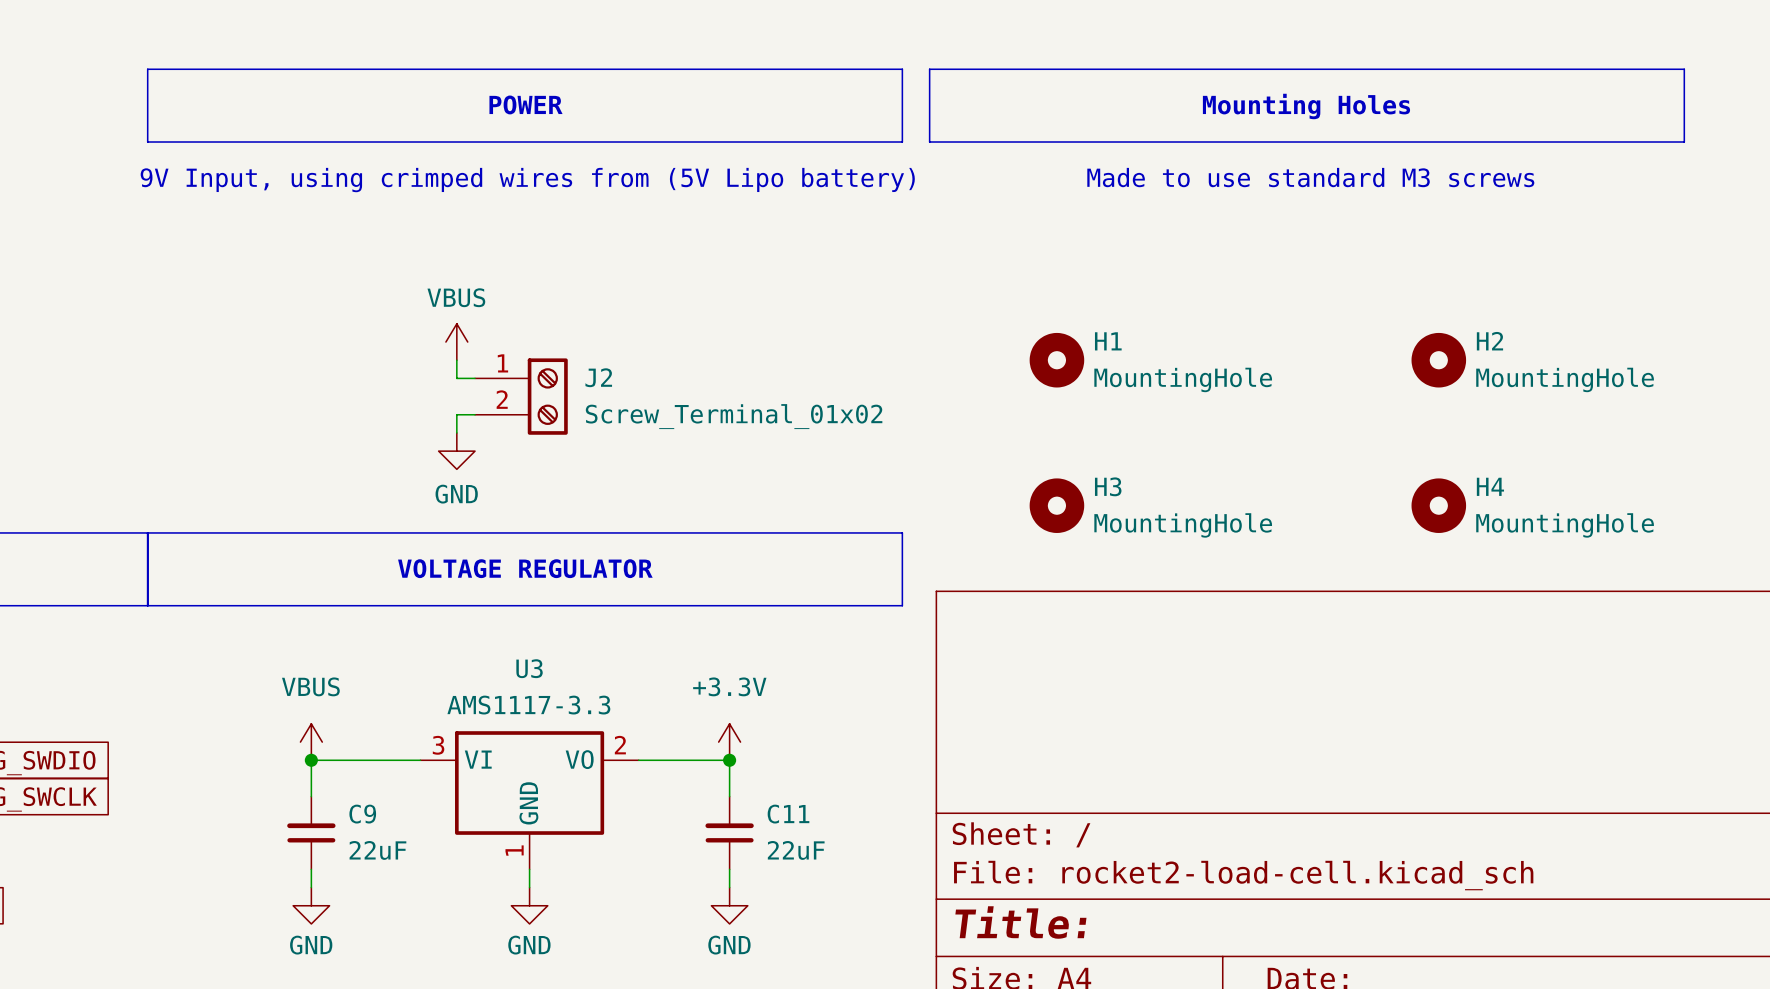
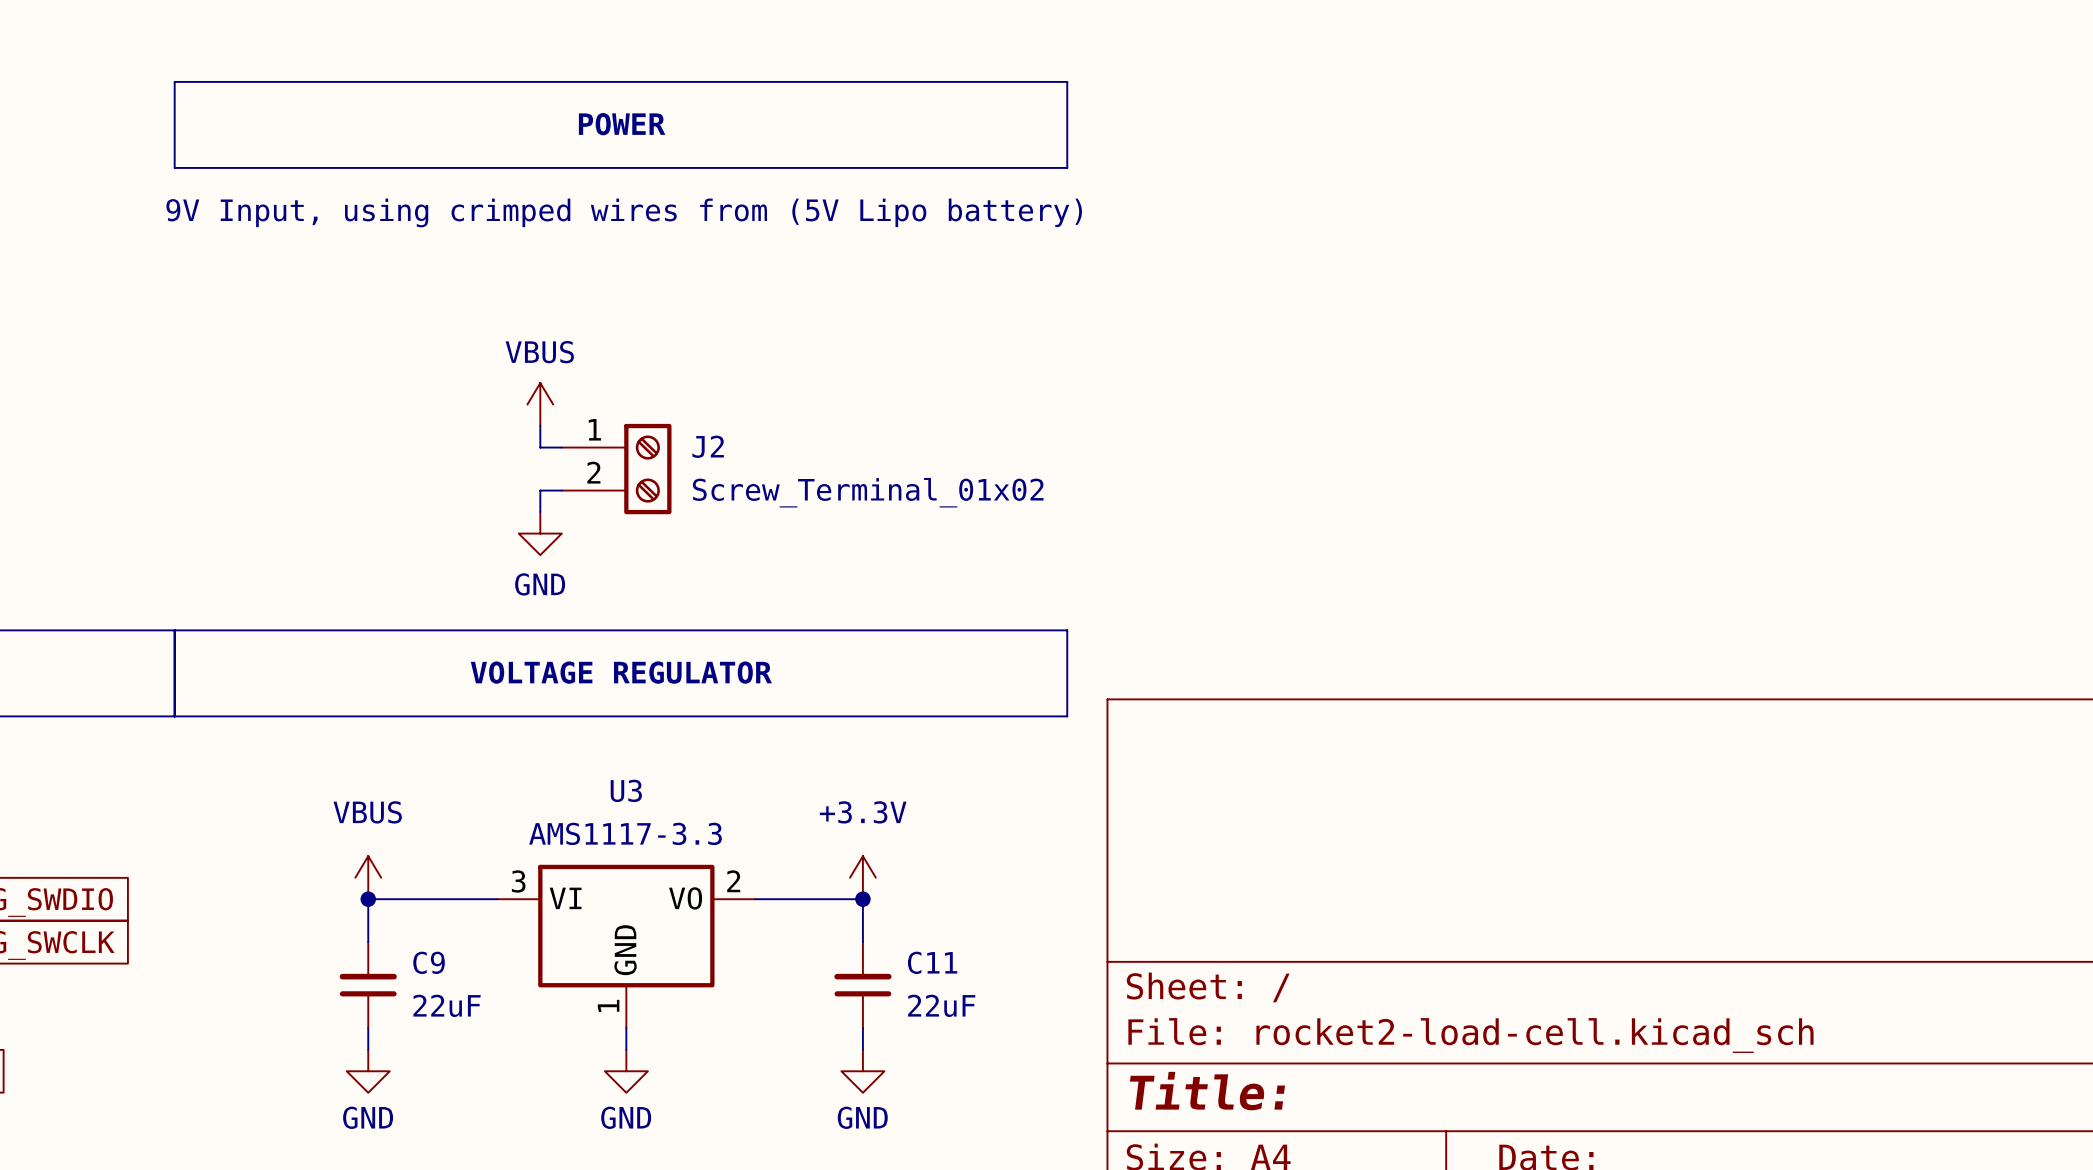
line: (929, 69) (1684, 69) (1684, 142) (929, 142) (929, 69) -> none
text: Mounting Holes (1306, 106) -> none
text: Made to use standard M3 screws (1310, 177) -> none
H1: MountingHole (1056, 360) -> none
H2: MountingHole (1438, 360) -> none
H3: MountingHole (1056, 505) -> none
H4: MountingHole (1438, 505) -> none

